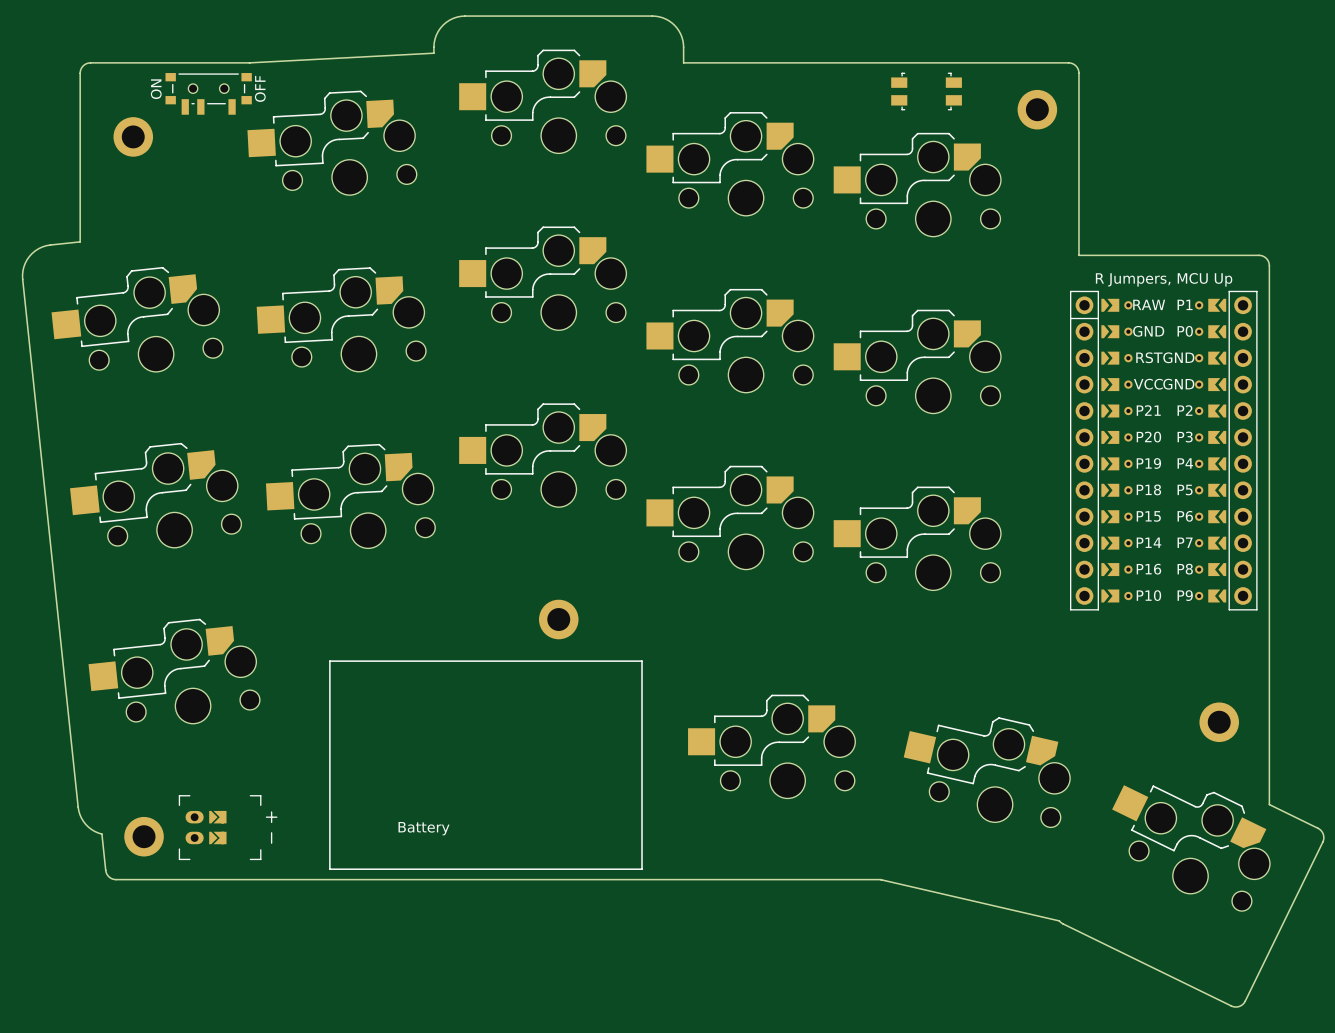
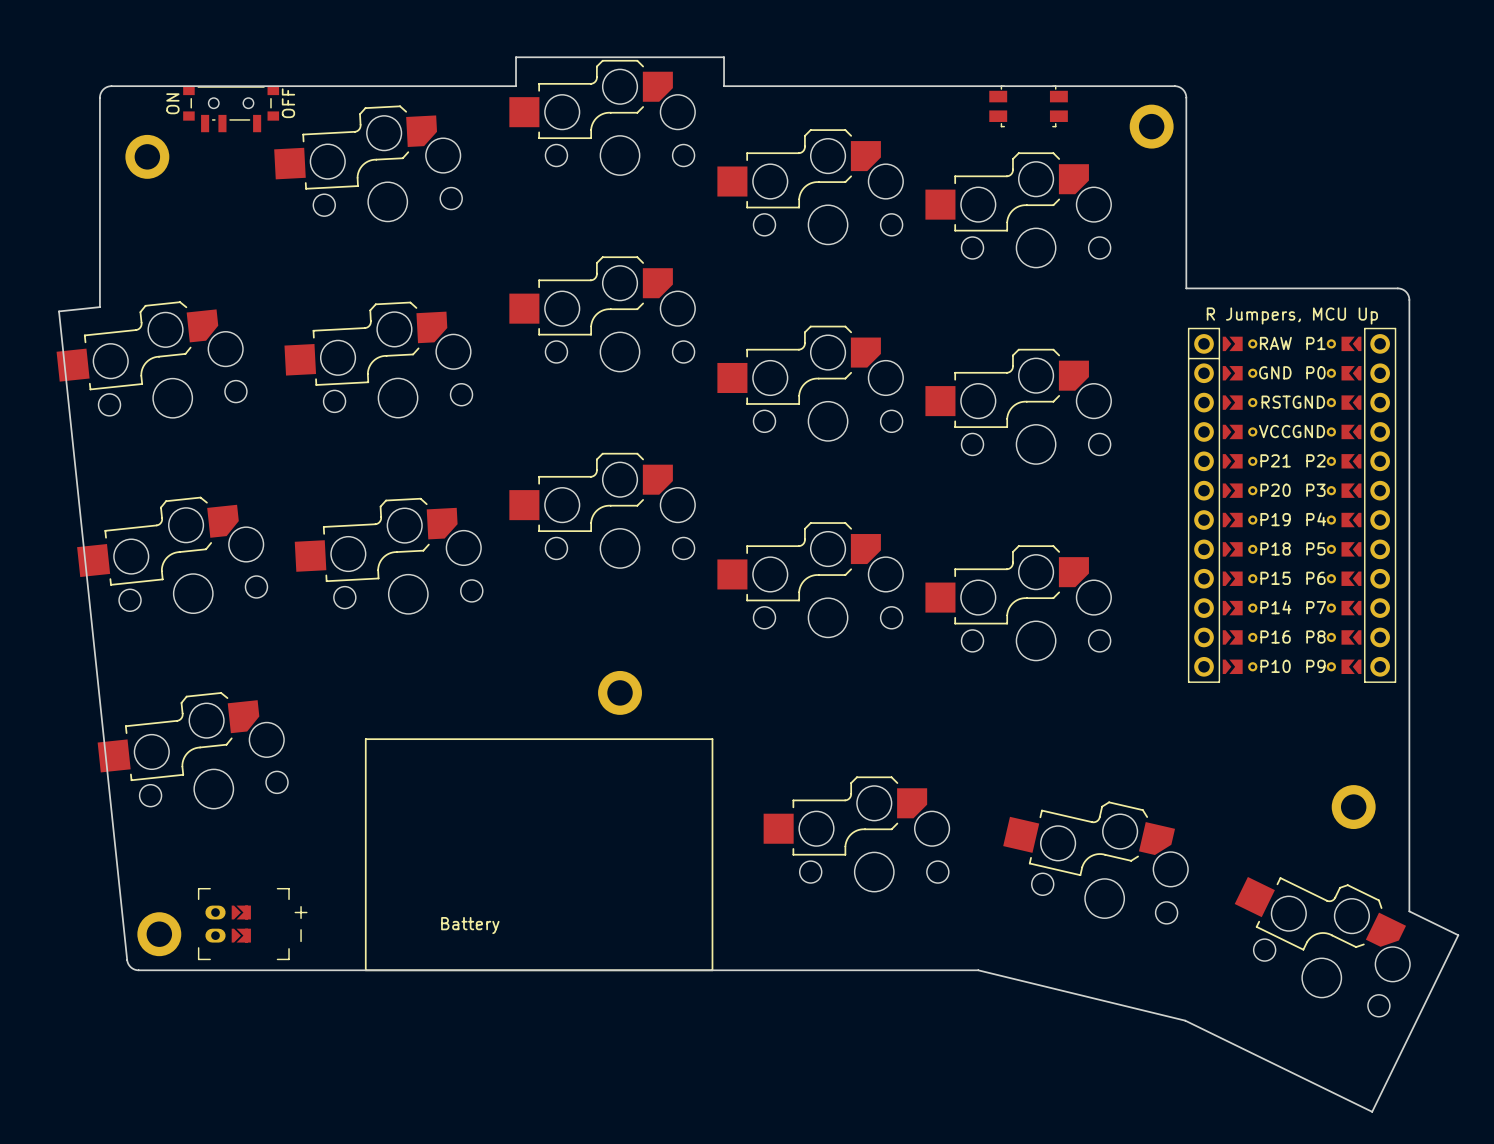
board edge: (1078, 255) (1078, 73) (1076, 66) (1070, 63) (683, 62) (683, 43) (680, 33) (671, 22) (659, 16) (465, 16) (453, 18) (440, 28) (434, 39) (433, 53) (249, 62) (90, 62) (85, 64) (80, 73) (80, 241) (50, 245) (38, 248) (27, 259) (22, 275) (79, 814) (88, 827) (101, 834) (105, 871) (109, 876) (114, 879) (880, 879) (1059, 920) (1235, 1007) (1241, 1005) (1245, 1001) (1323, 838) (1322, 833) (1319, 828) (1269, 804) -> (1197, 288) (1186, 288) (1186, 97) (1183, 90) (1177, 86) (724, 86) (724, 57) (516, 57) (516, 86) (111, 86) (105, 87) (99, 97) (99, 307) (59, 311) (127, 962) (132, 968) (138, 970) (978, 970) (1185, 1020) (1372, 1111) (1458, 935) (1409, 911) (1409, 898)

